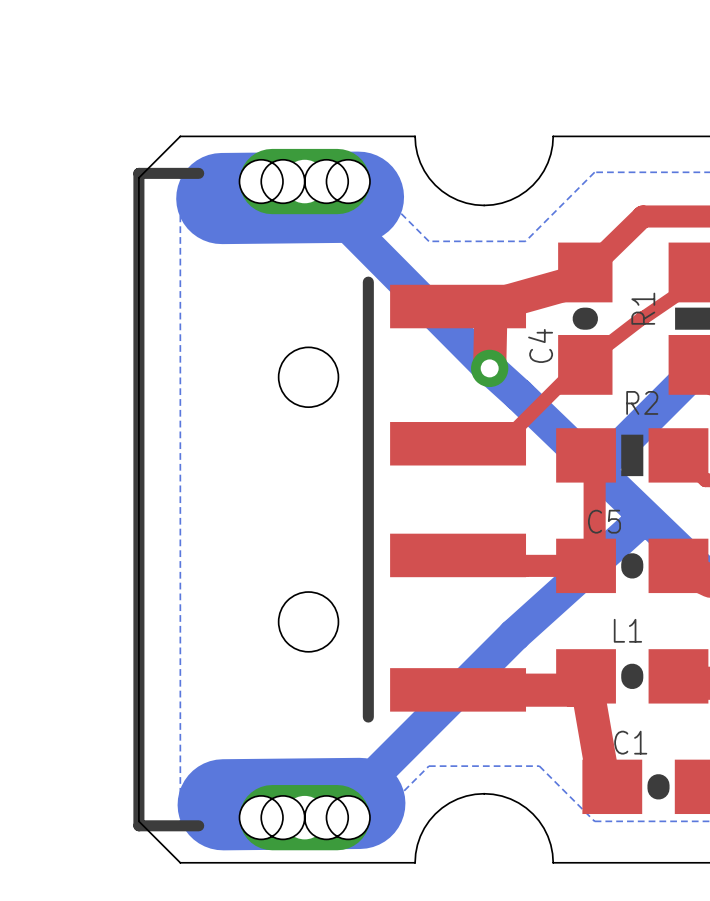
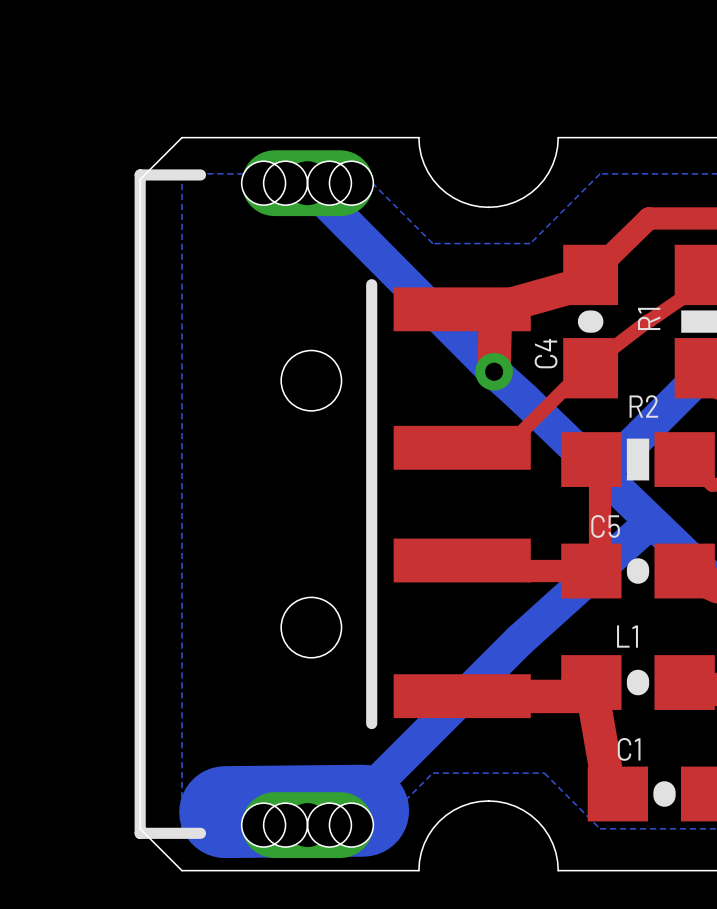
bottom track: (358, 197) (221, 198) -> none

